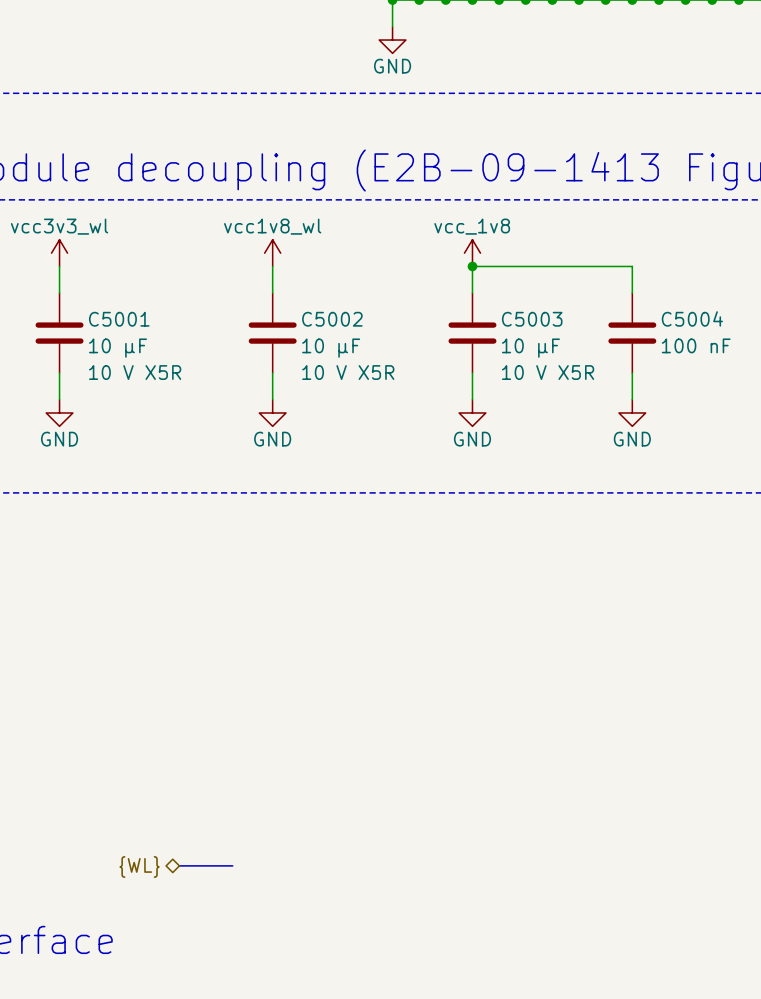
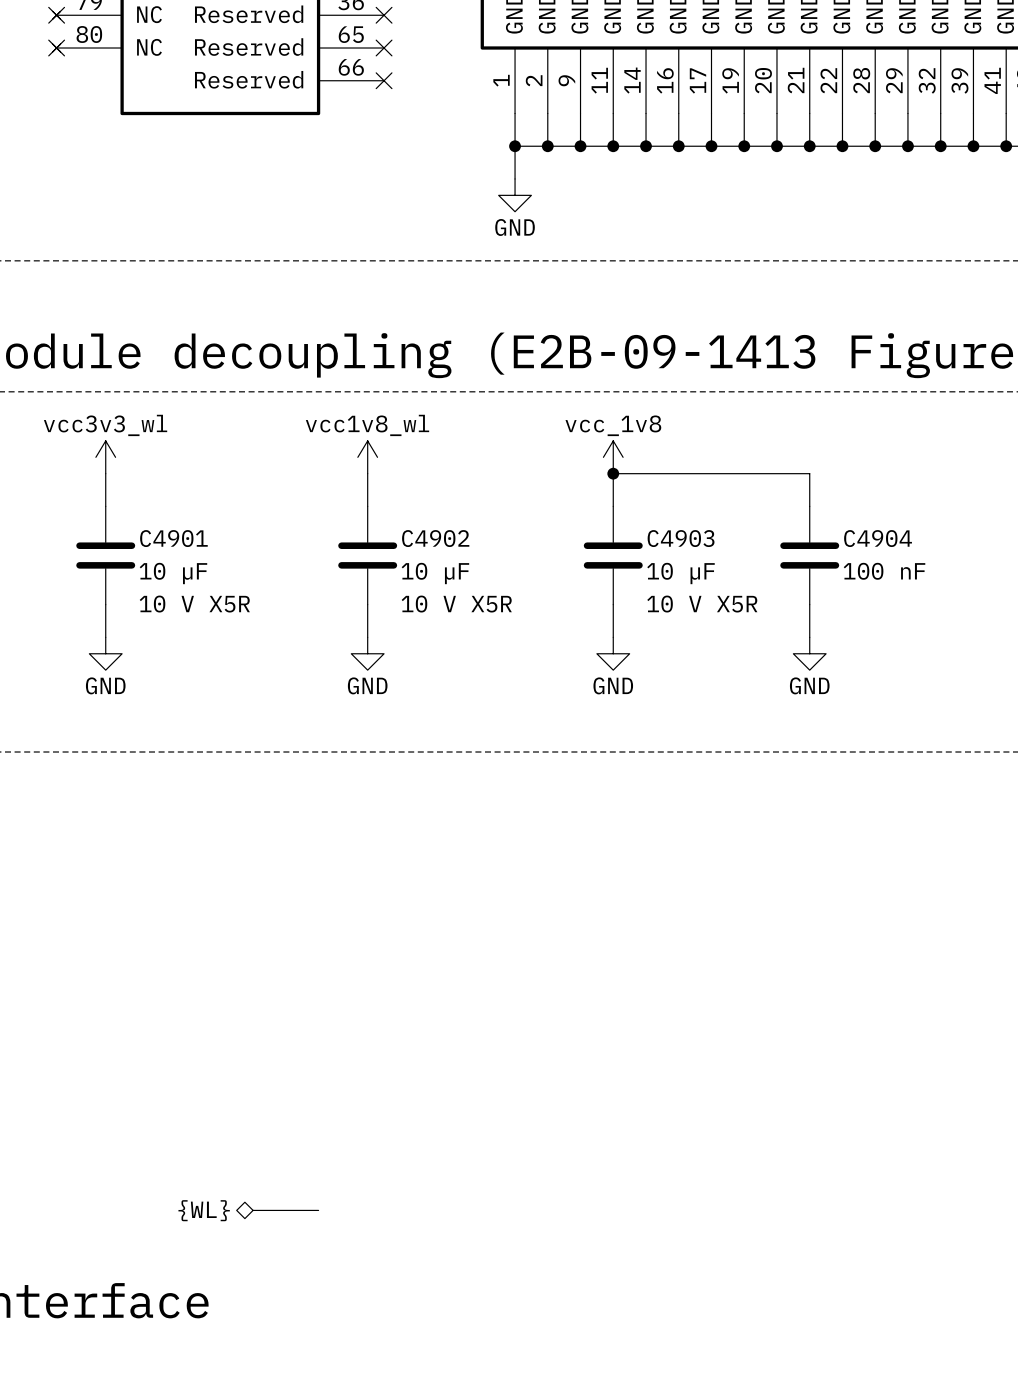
C5004 name: C5004 (692, 318) -> C4904 (878, 538)
C5001 name: C5001 (119, 319) -> C4901 (173, 538)
C5002 name: C5002 (332, 319) -> C4902 (435, 538)
C5003 name: C5003 (532, 319) -> C4903 (681, 538)

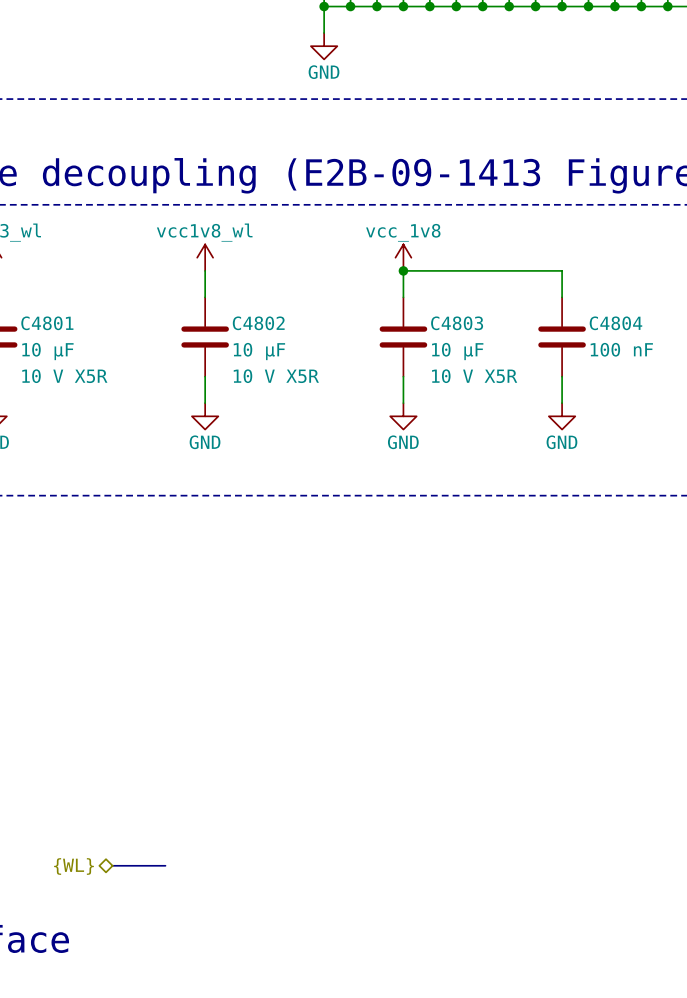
C4901 name: C4901 (173, 538) -> C4801 (47, 323)
C4902 name: C4902 (435, 538) -> C4802 (258, 323)
C4903 name: C4903 (681, 538) -> C4803 (457, 323)
C4904 name: C4904 (878, 538) -> C4804 (615, 323)

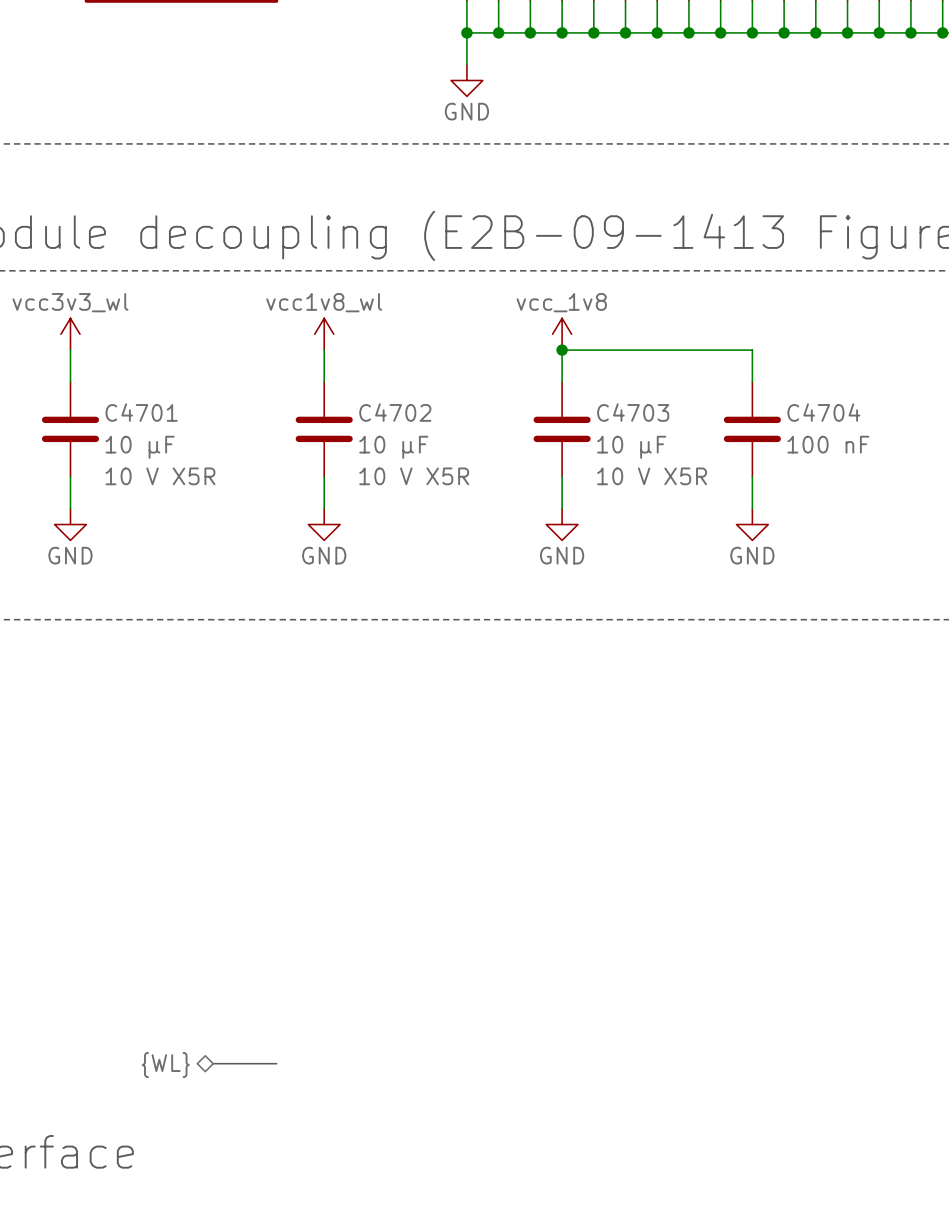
C4801 name: C4801 (47, 323) -> C4701 (141, 412)
C4802 name: C4802 (258, 323) -> C4702 (395, 412)
C4803 name: C4803 (457, 323) -> C4703 (633, 412)
C4804 name: C4804 (615, 323) -> C4704 (823, 412)

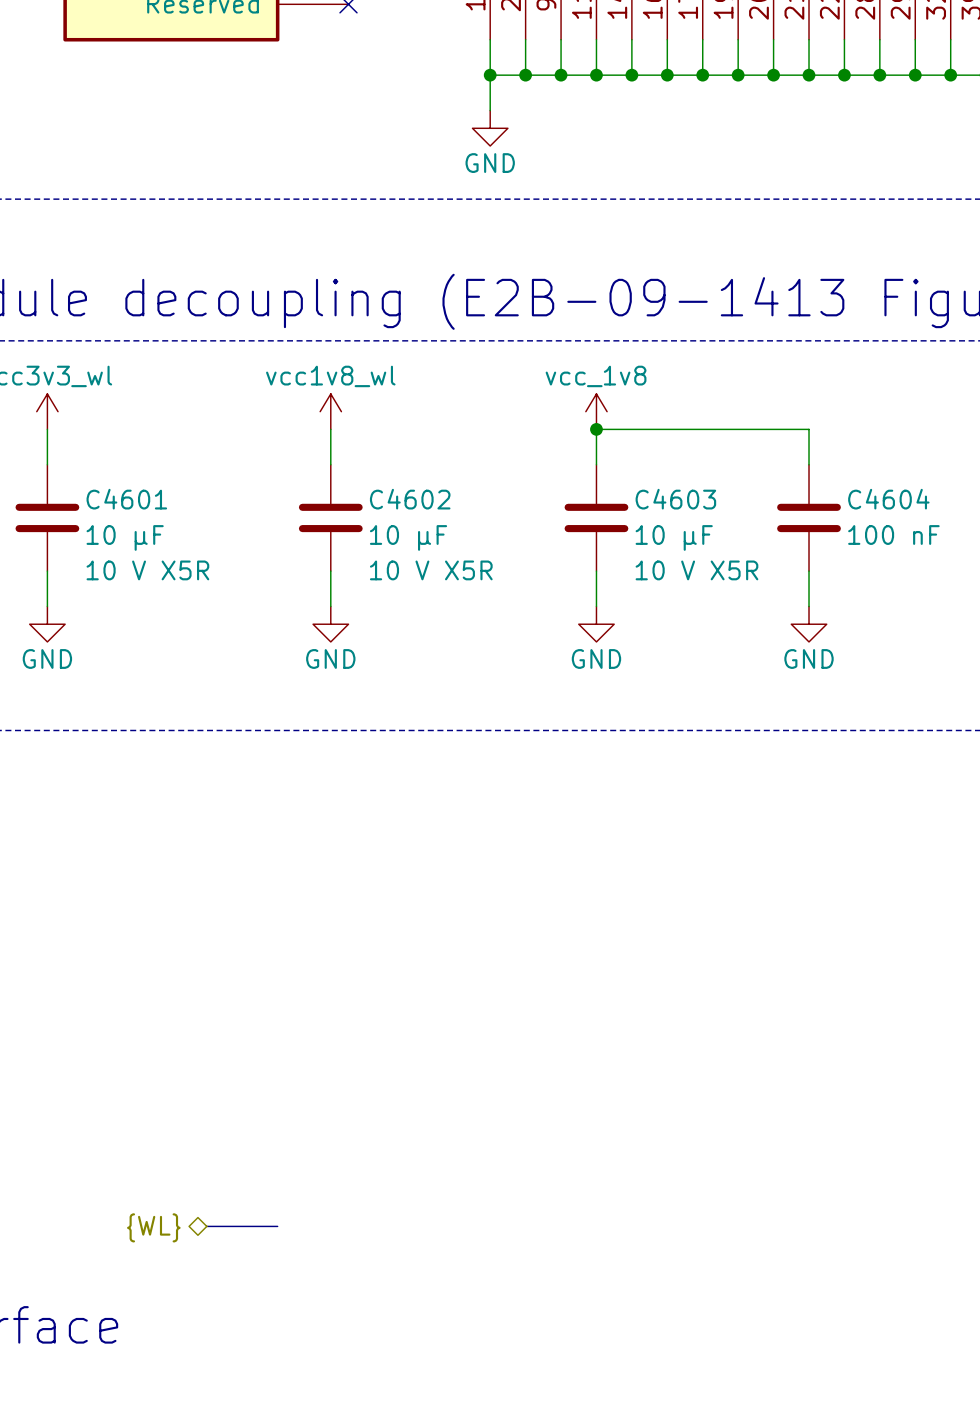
C4701 name: C4701 (141, 412) -> C4601 (126, 499)
C4702 name: C4702 (395, 412) -> C4602 (410, 499)
C4703 name: C4703 (633, 412) -> C4603 (675, 499)
C4704 name: C4704 (823, 412) -> C4604 (888, 499)

